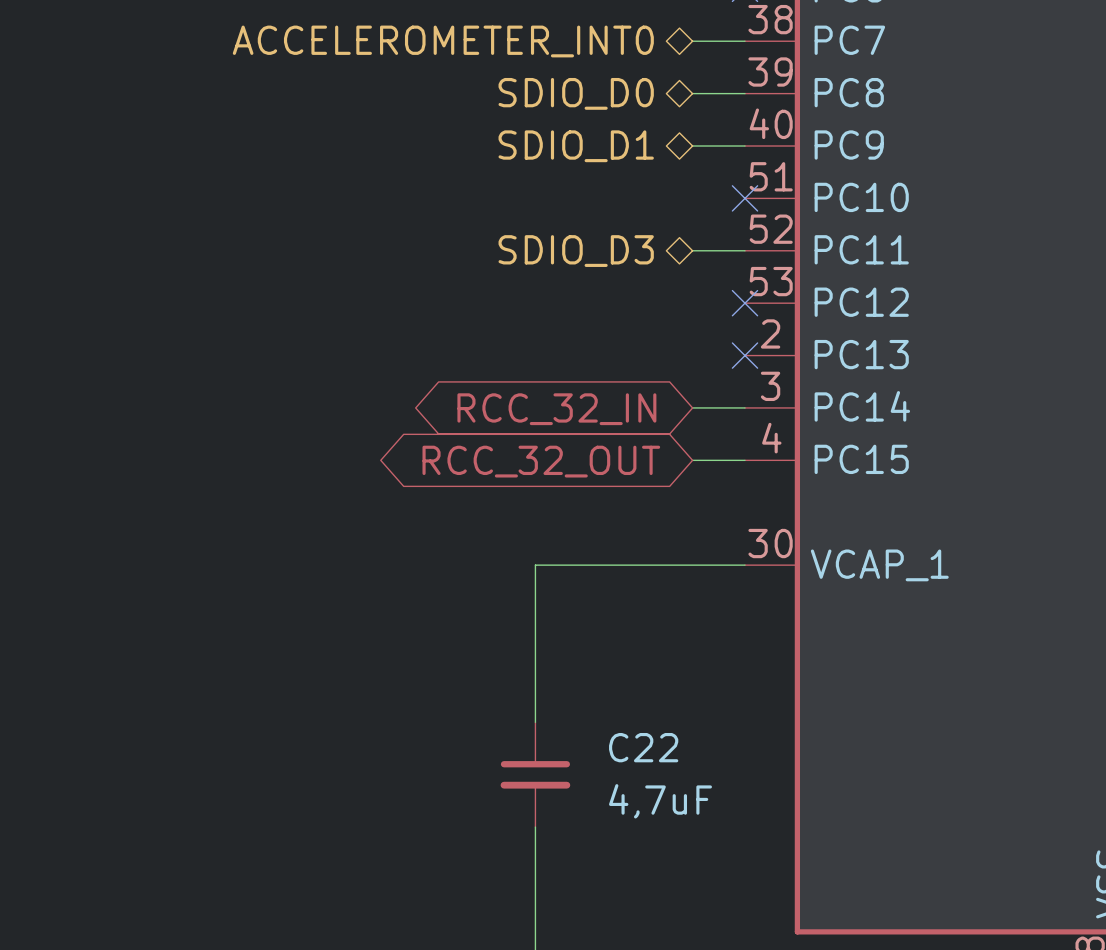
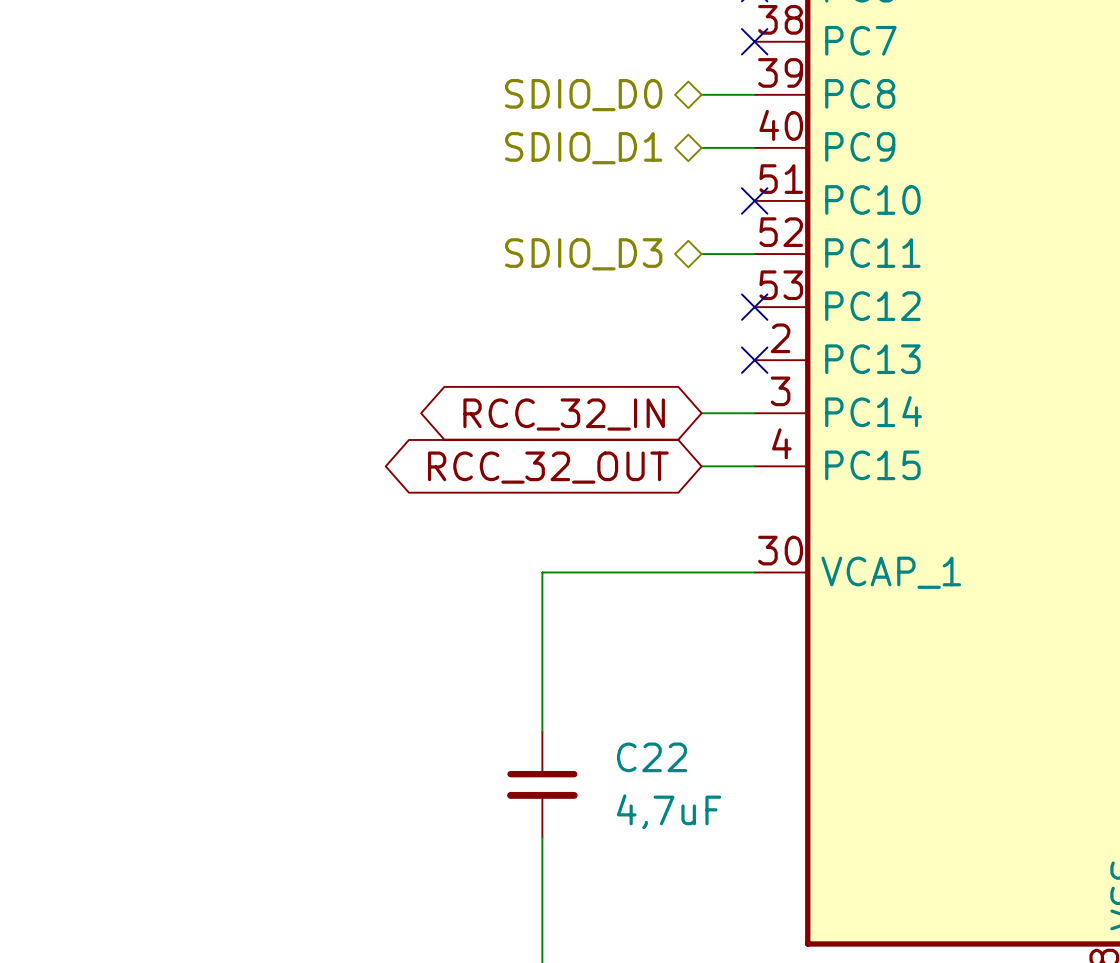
hierarchical label: ACCELEROMETER_INT0 (443, 41) -> none
wire: (692, 41) (744, 41) -> none
no-connect mark: none -> (754, 41)

